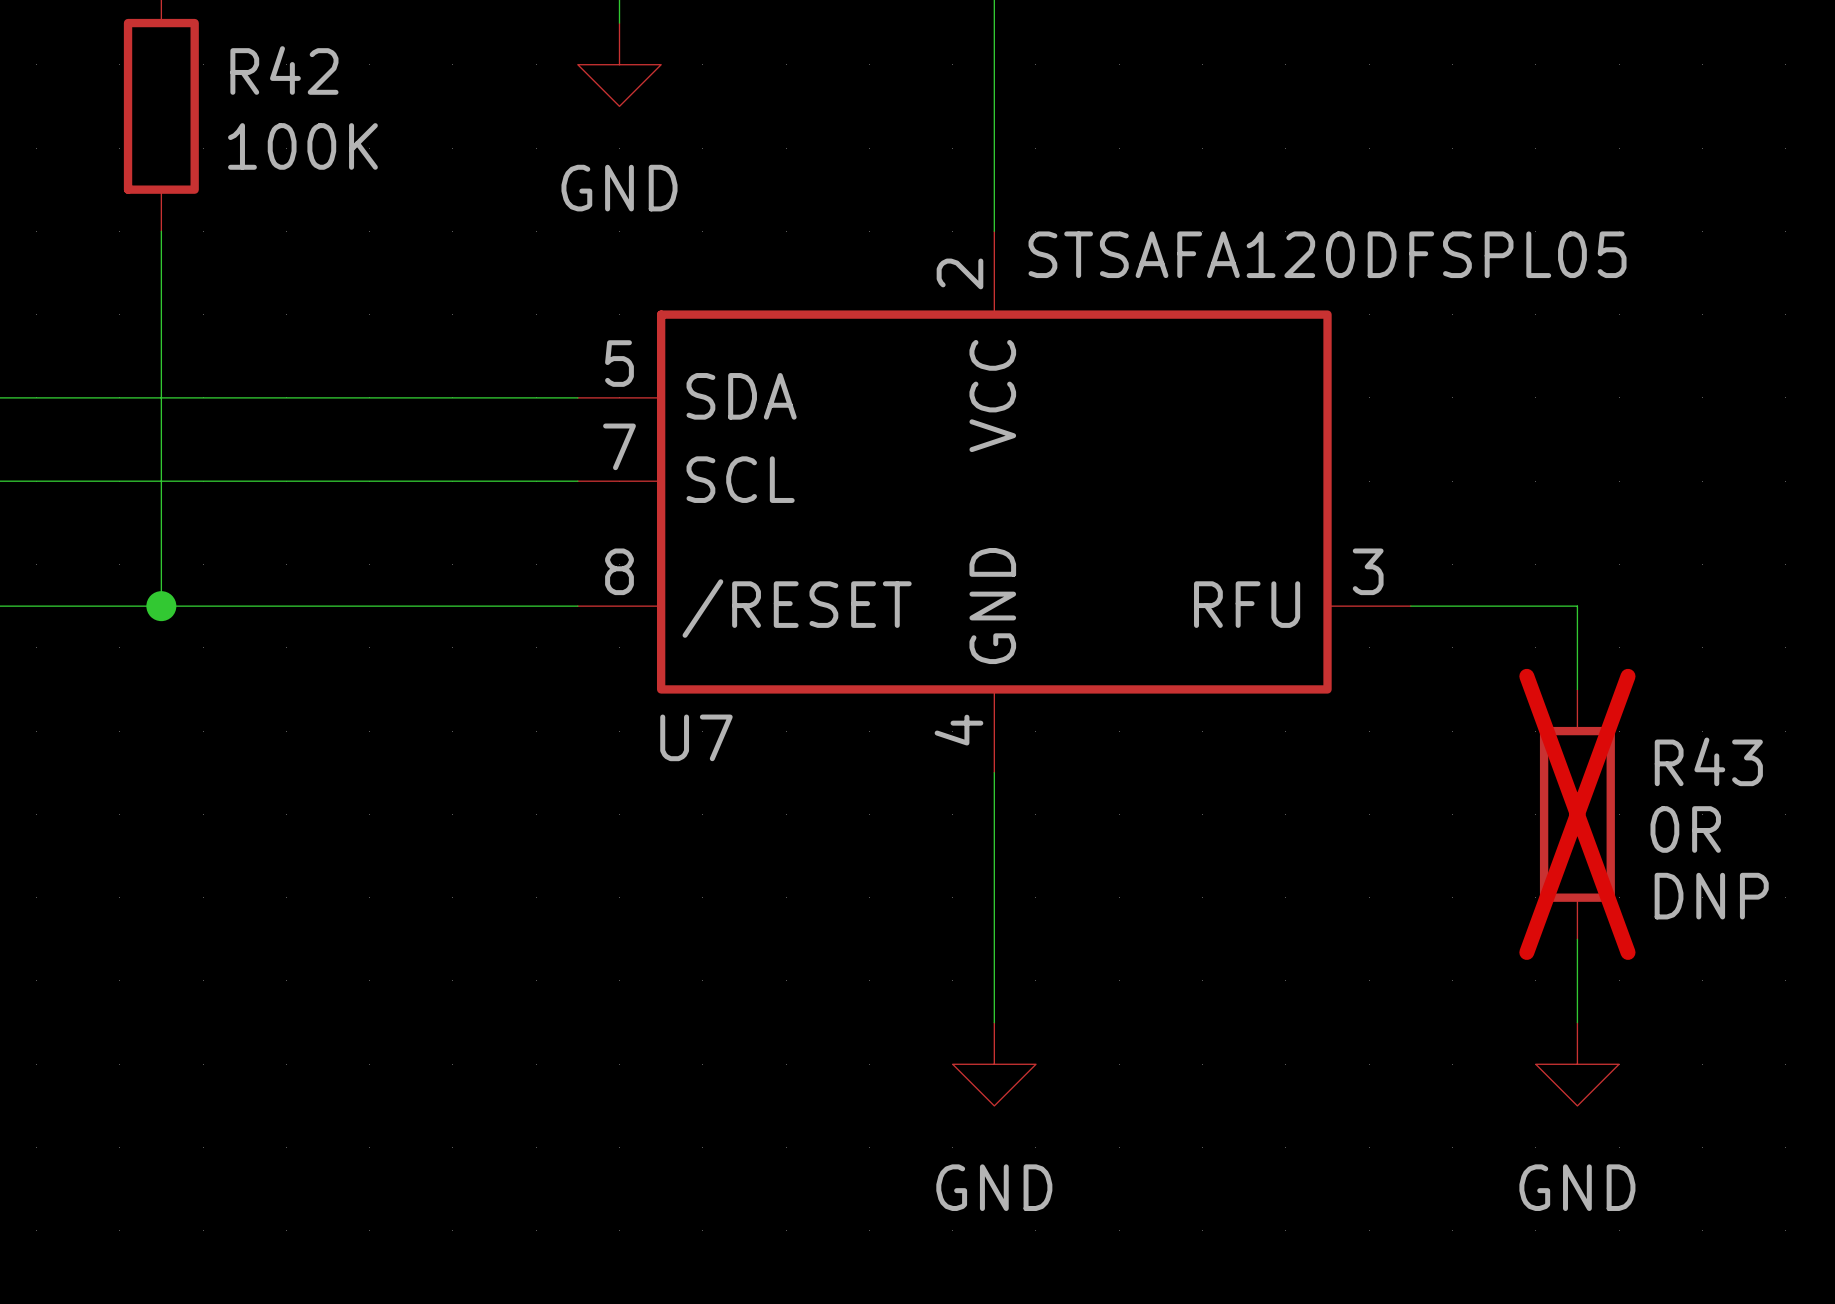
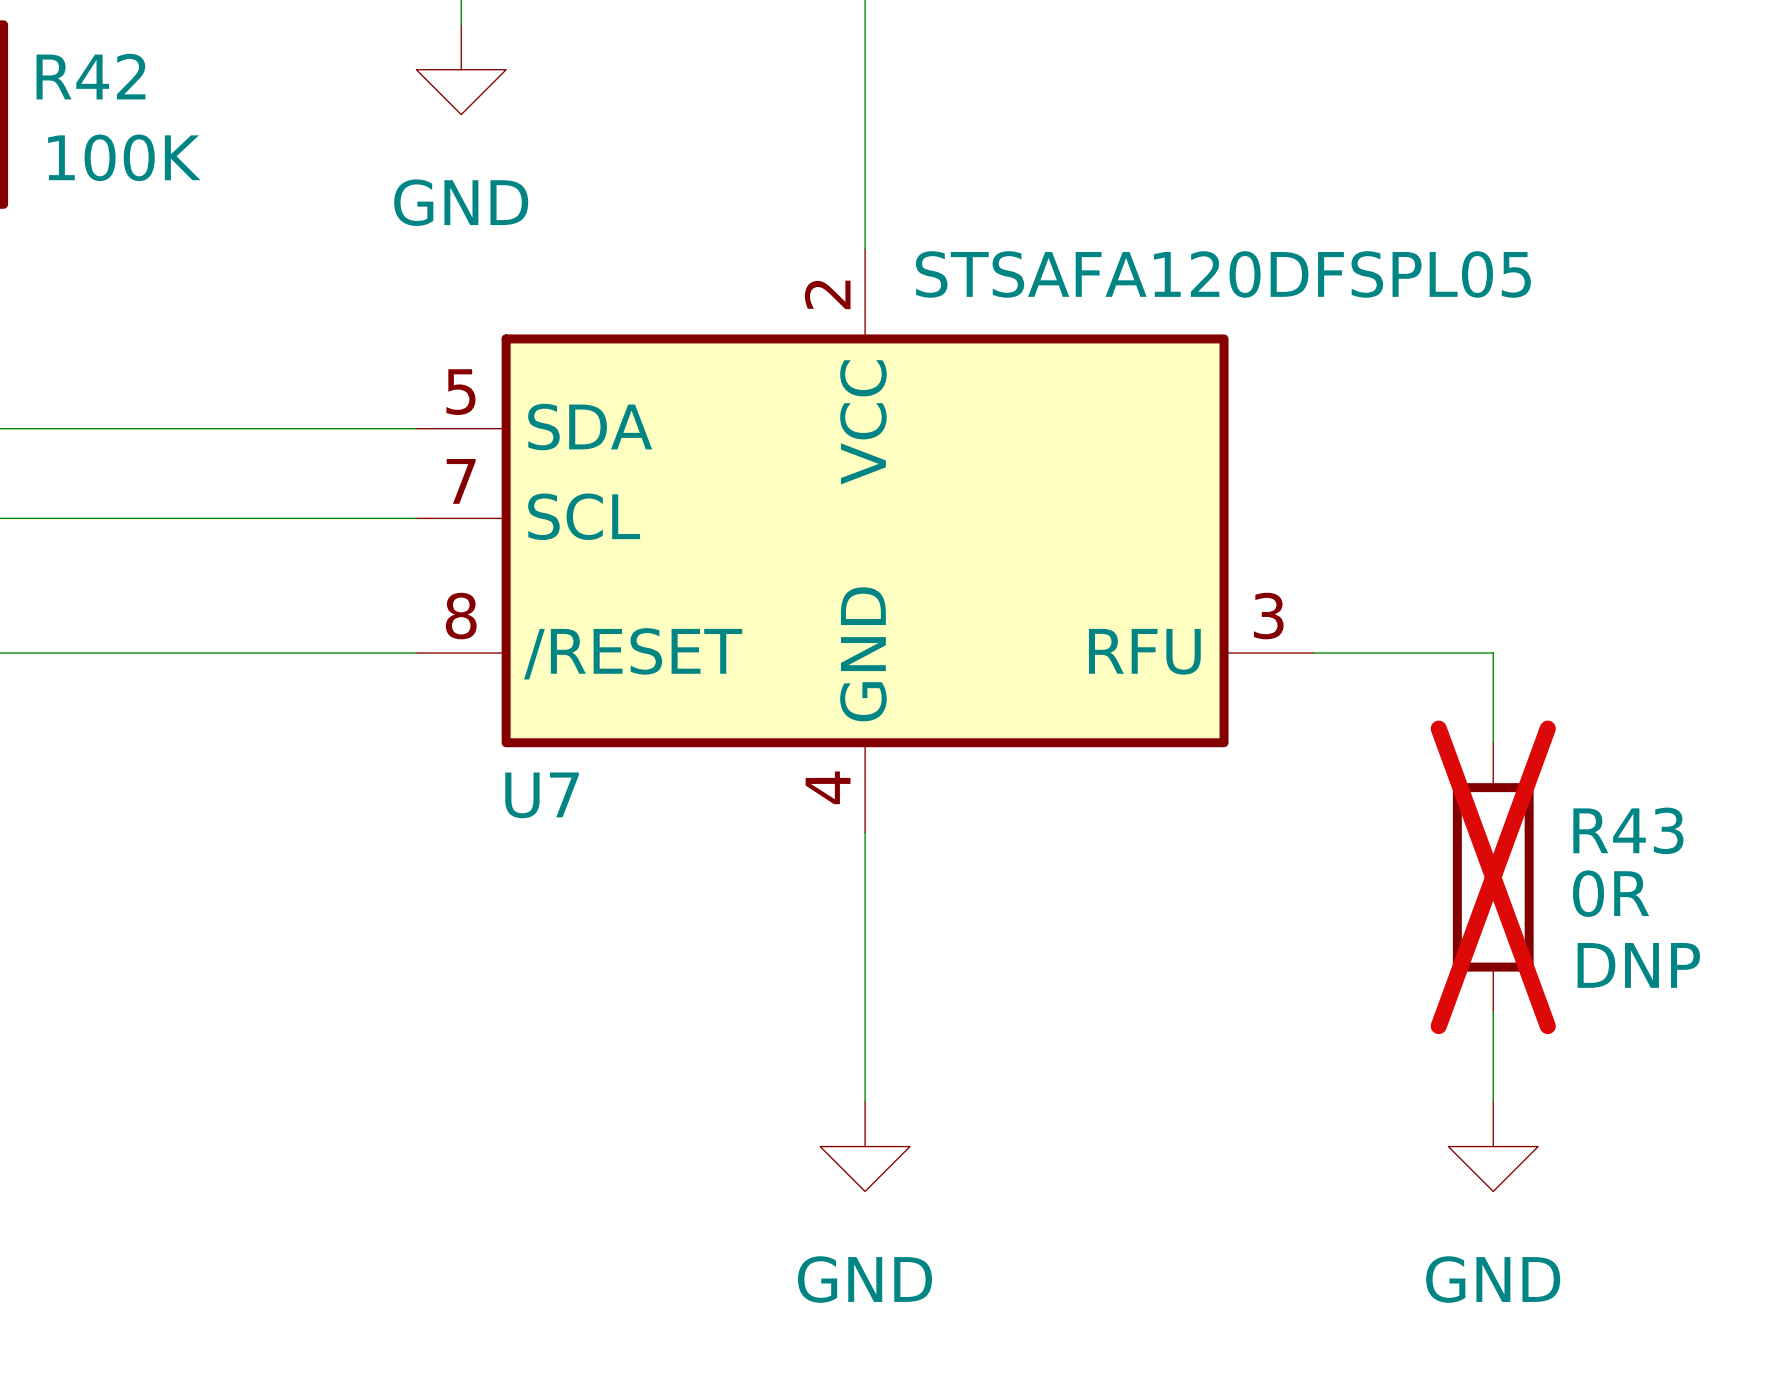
R43 name position: R43 (1708, 761) -> R43 (1628, 830)

